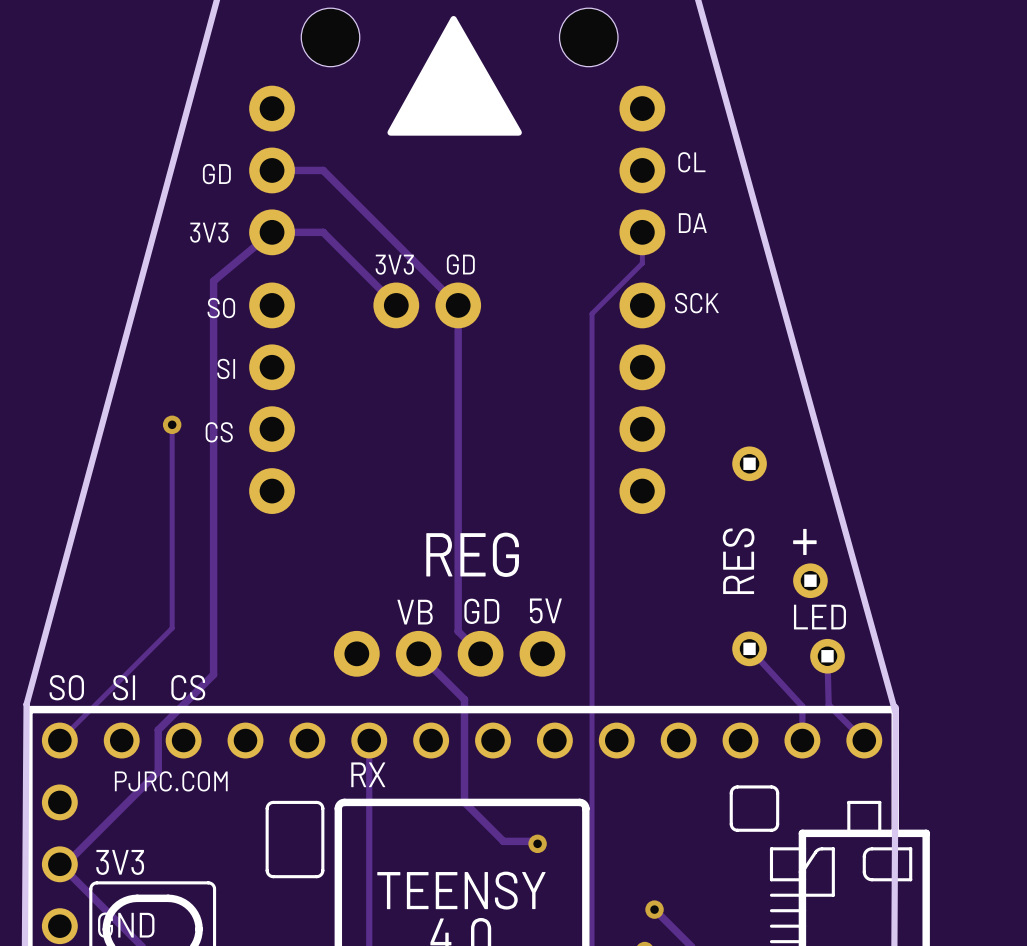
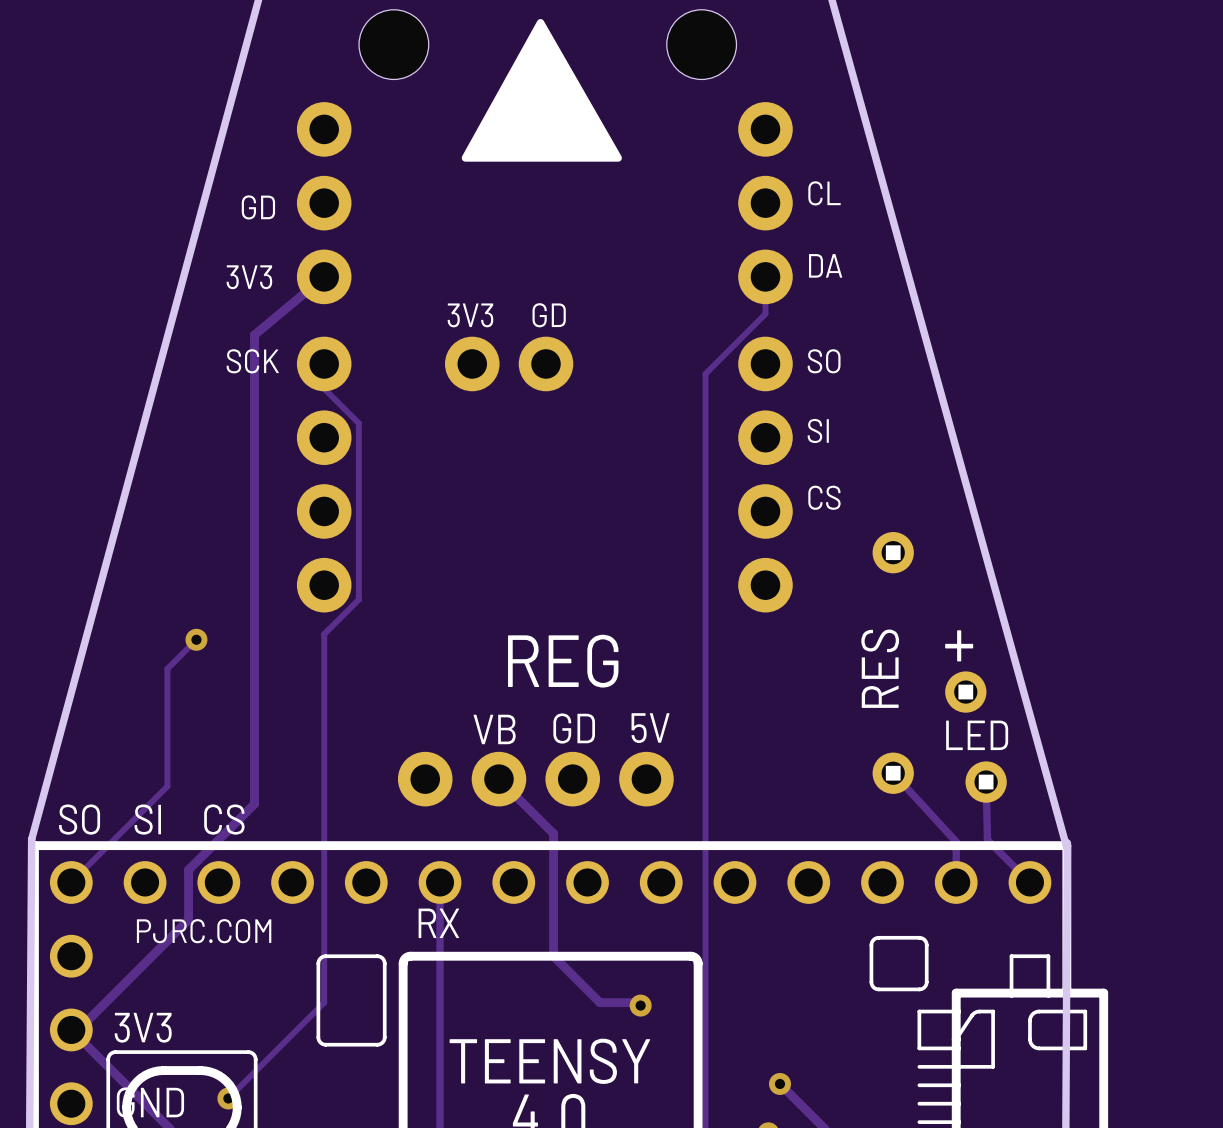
track: (272, 170) (323, 170) (458, 305) (458, 631) (480, 653) -> none
track: (272, 232) (323, 232) (396, 305) -> none
text: SCK (696, 303) -> SO (824, 361)
track: none -> (324, 363) (324, 388) (358, 423) (358, 599) (324, 634) (324, 1002) (228, 1098)
text: SO (221, 308) -> SCK (252, 361)
text position: SI (226, 368) -> SI (818, 430)
track: (172, 424) (172, 628) (140, 659) -> (196, 639) (167, 668) (167, 786)
via position: (172, 424) -> (196, 639)
text position: CS (219, 432) -> CS (824, 497)
via: none -> (228, 1098)

